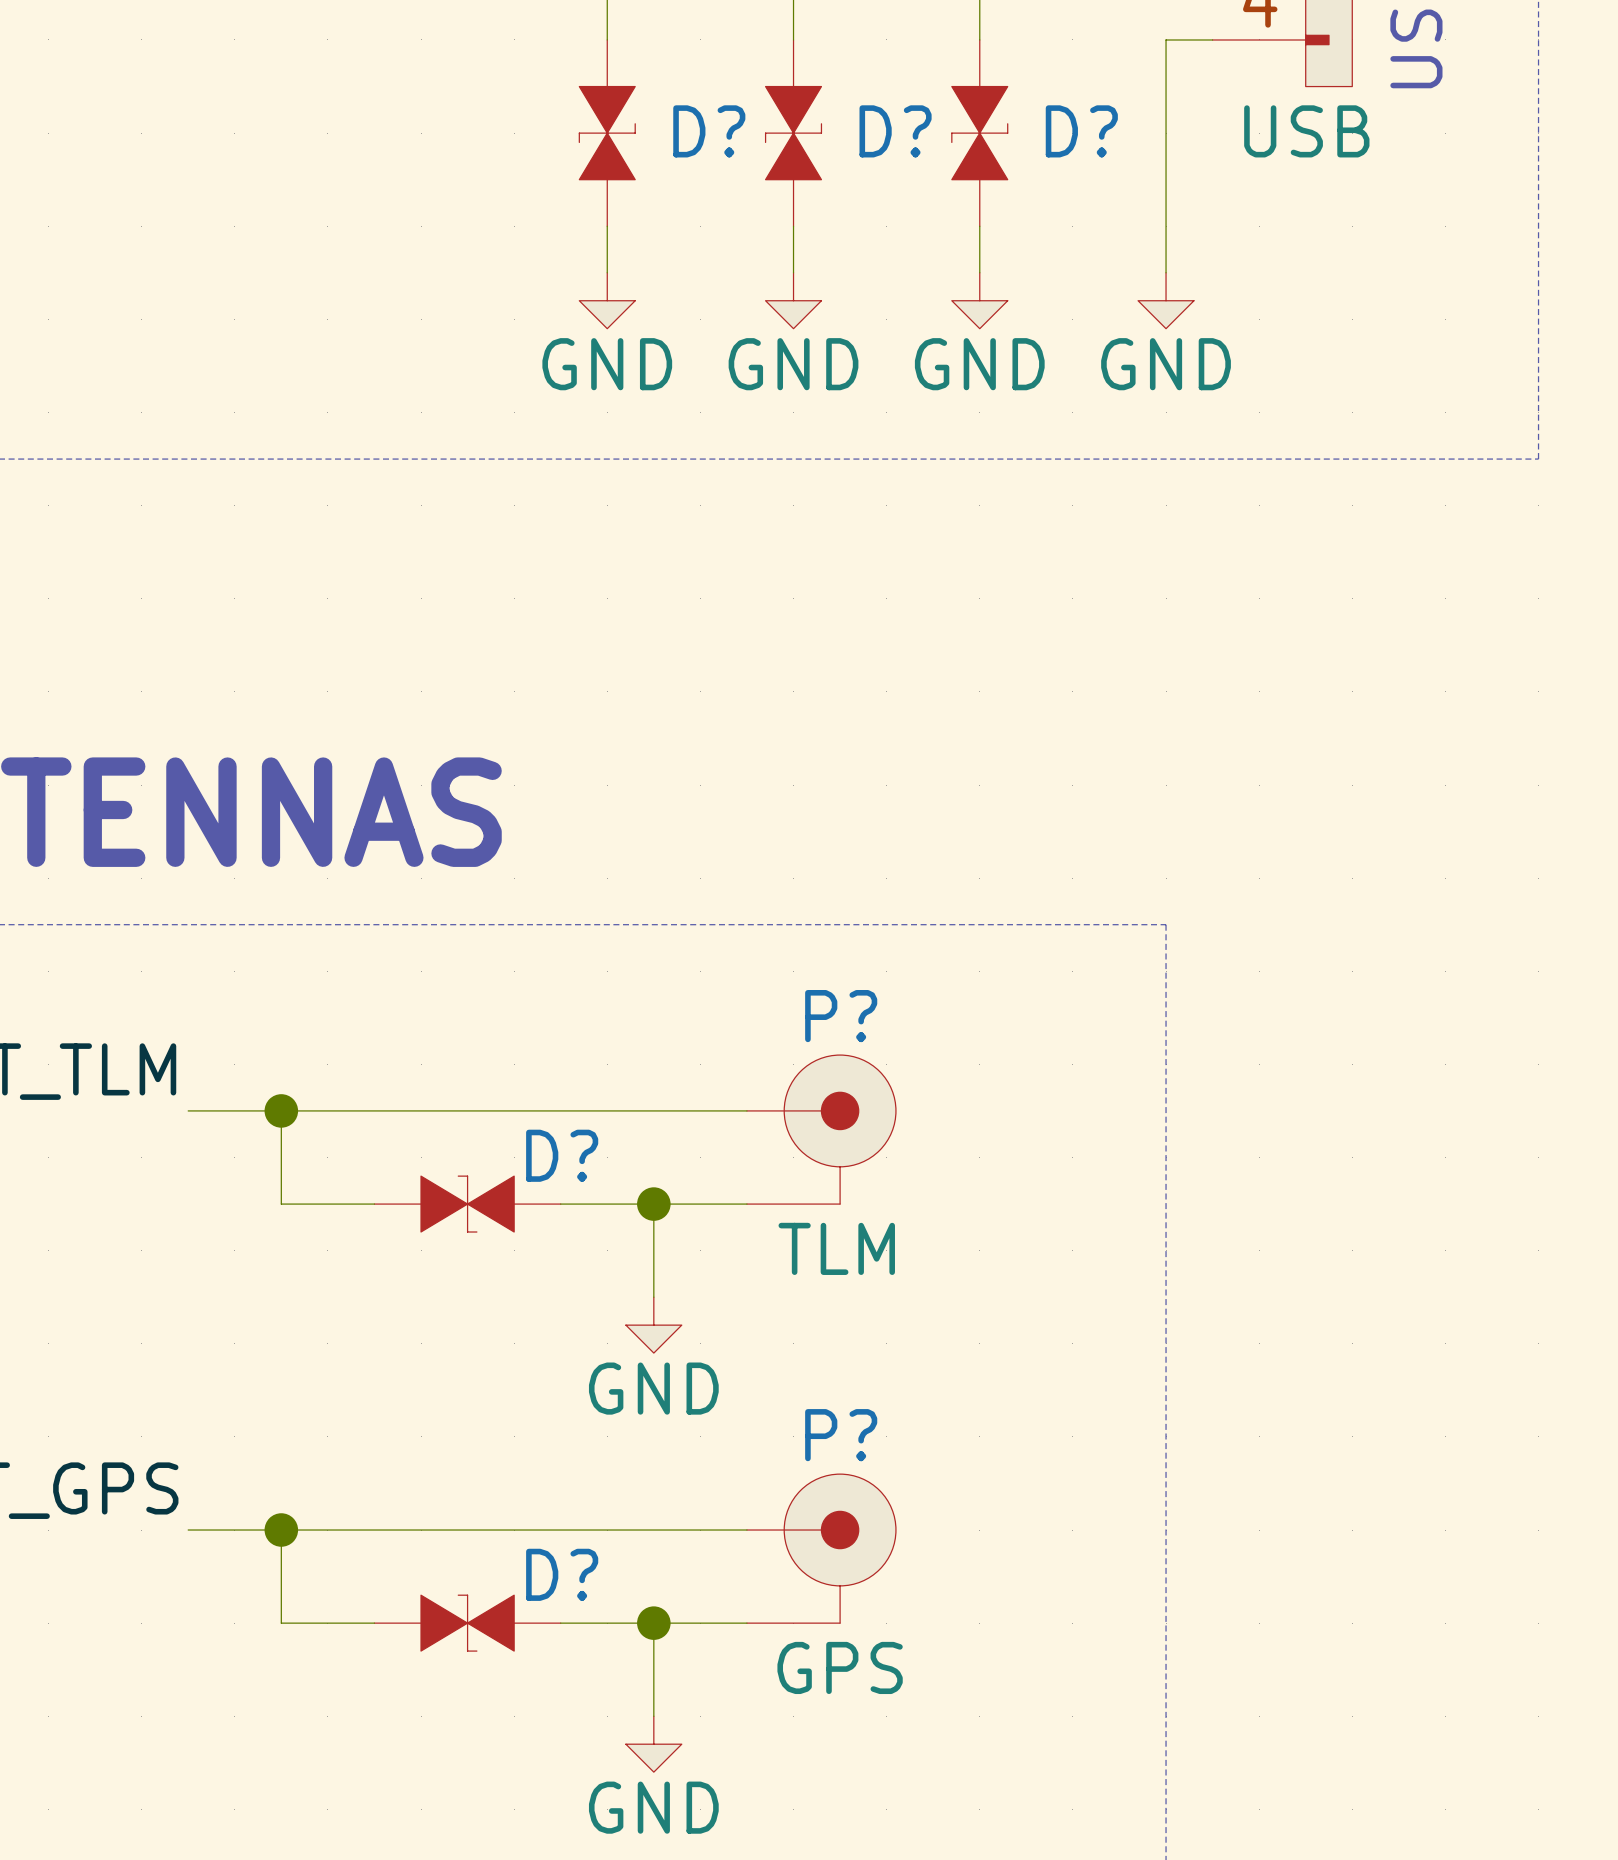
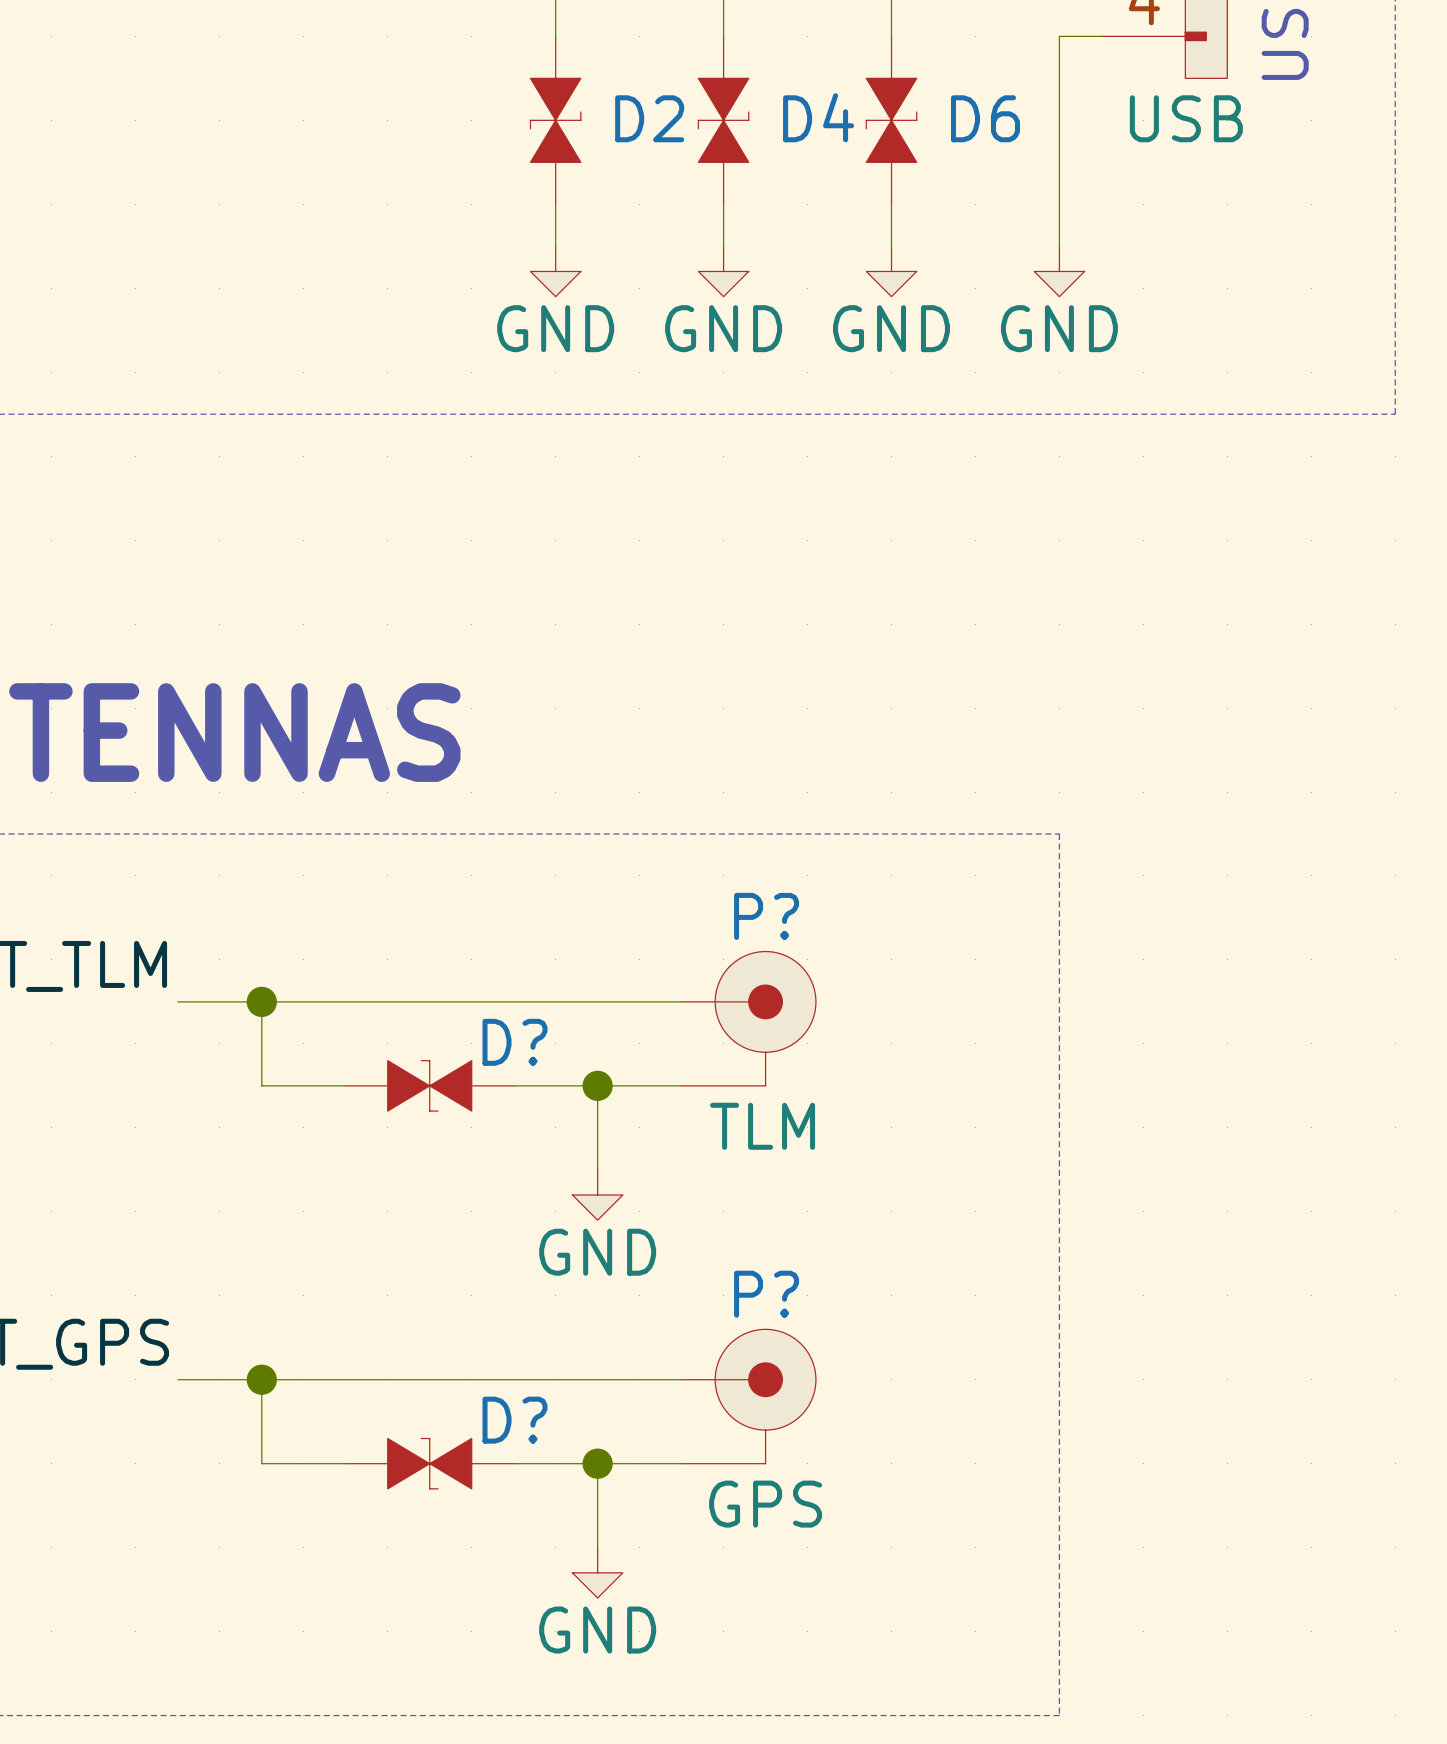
D? name: D? (709, 131) -> D2 (649, 118)
D? name: D? (895, 131) -> D4 (818, 117)
D? name: D? (1081, 131) -> D6 (985, 118)

